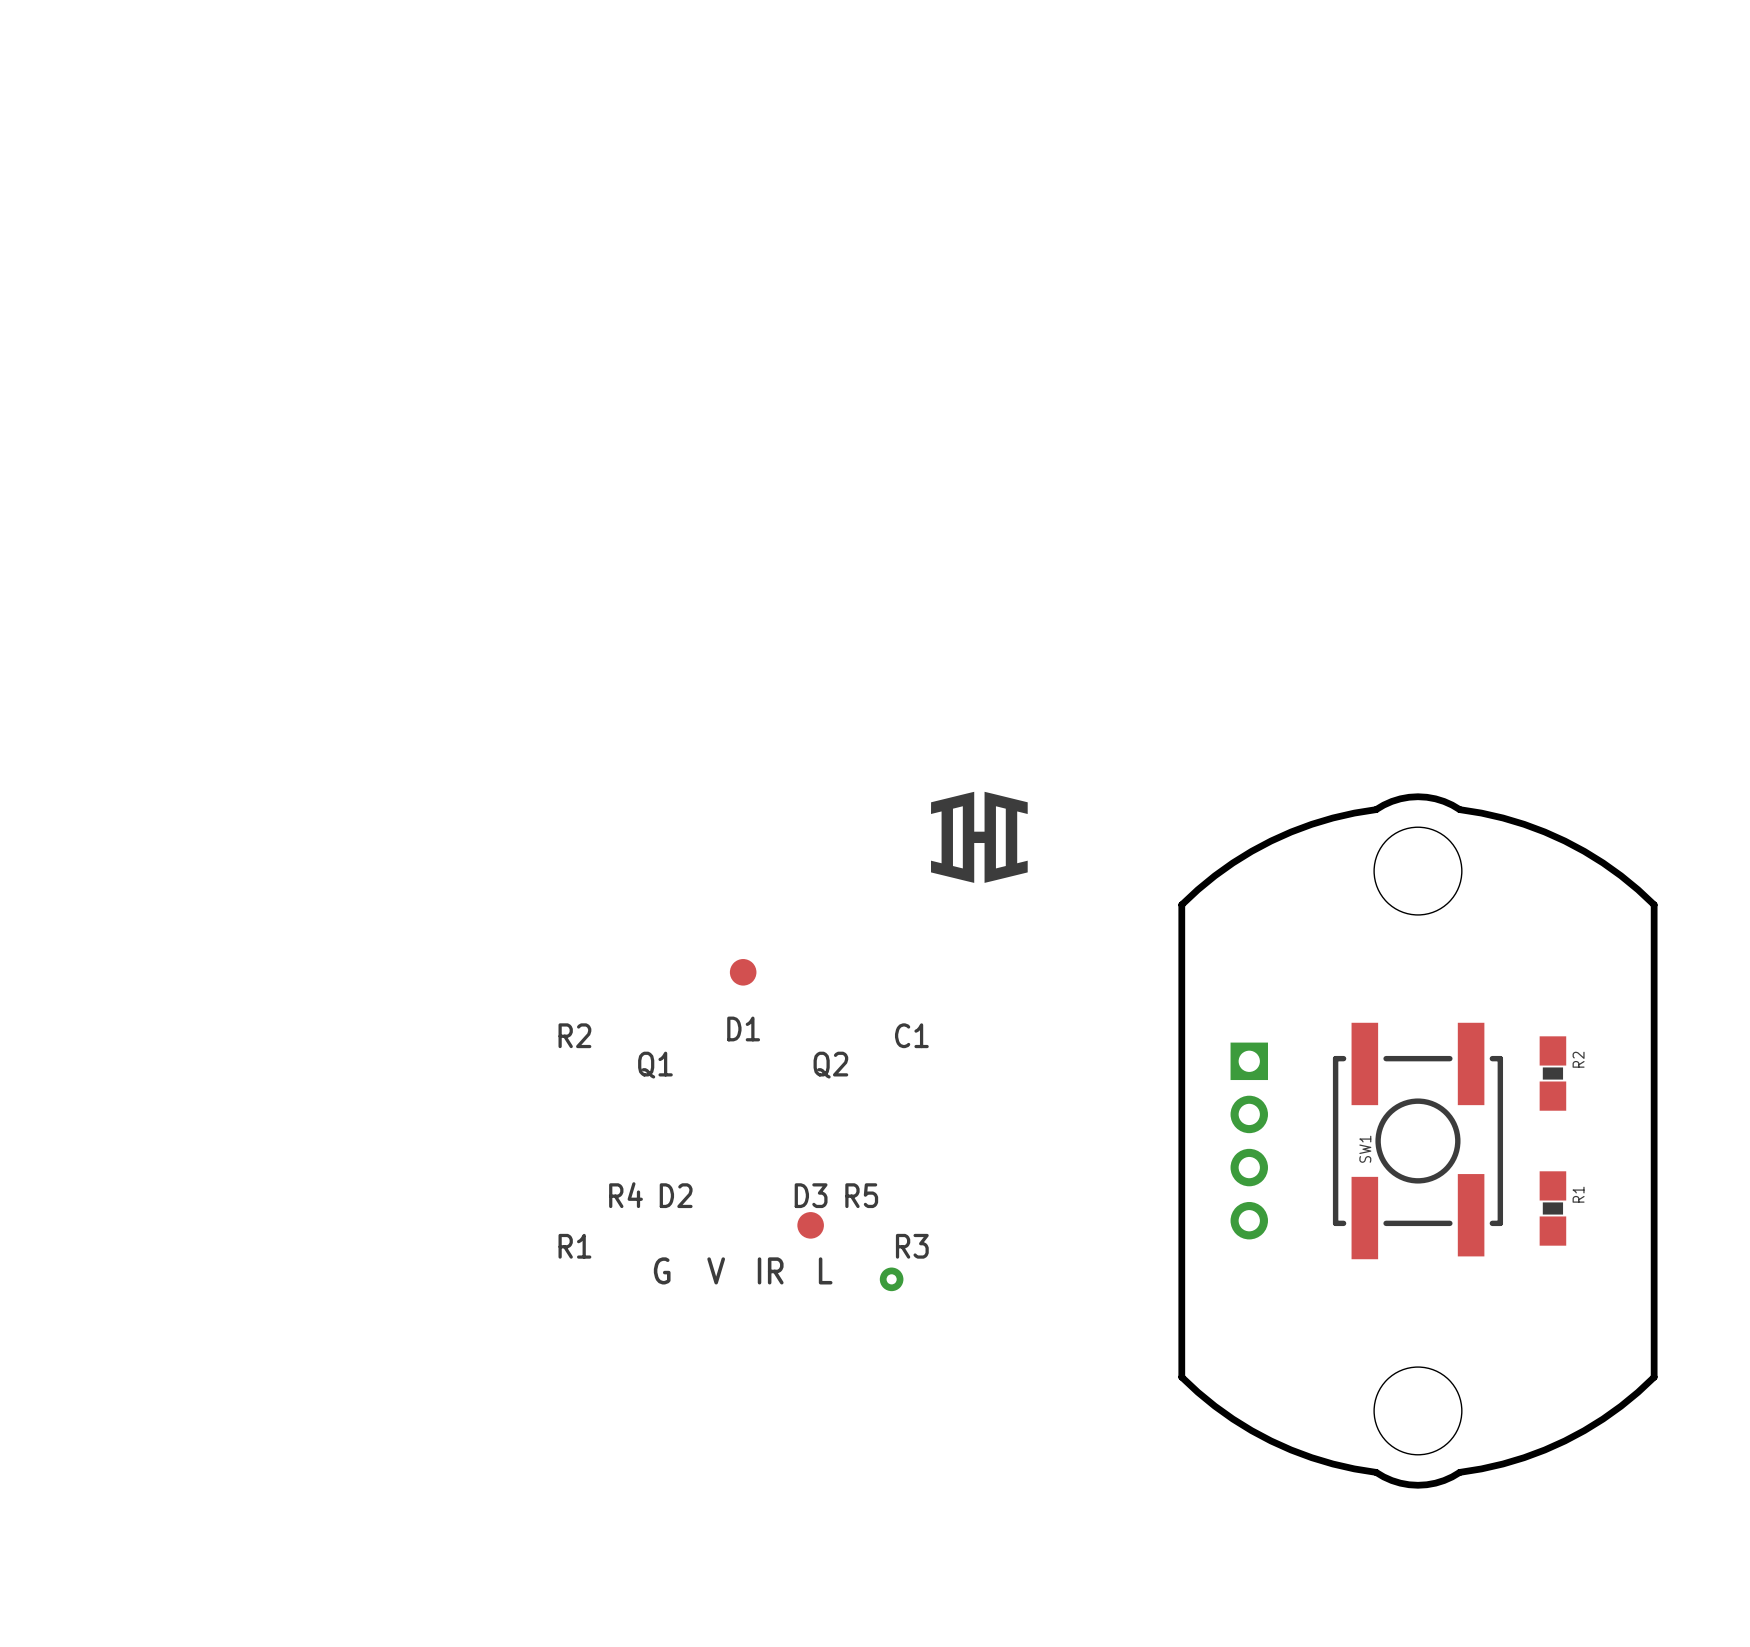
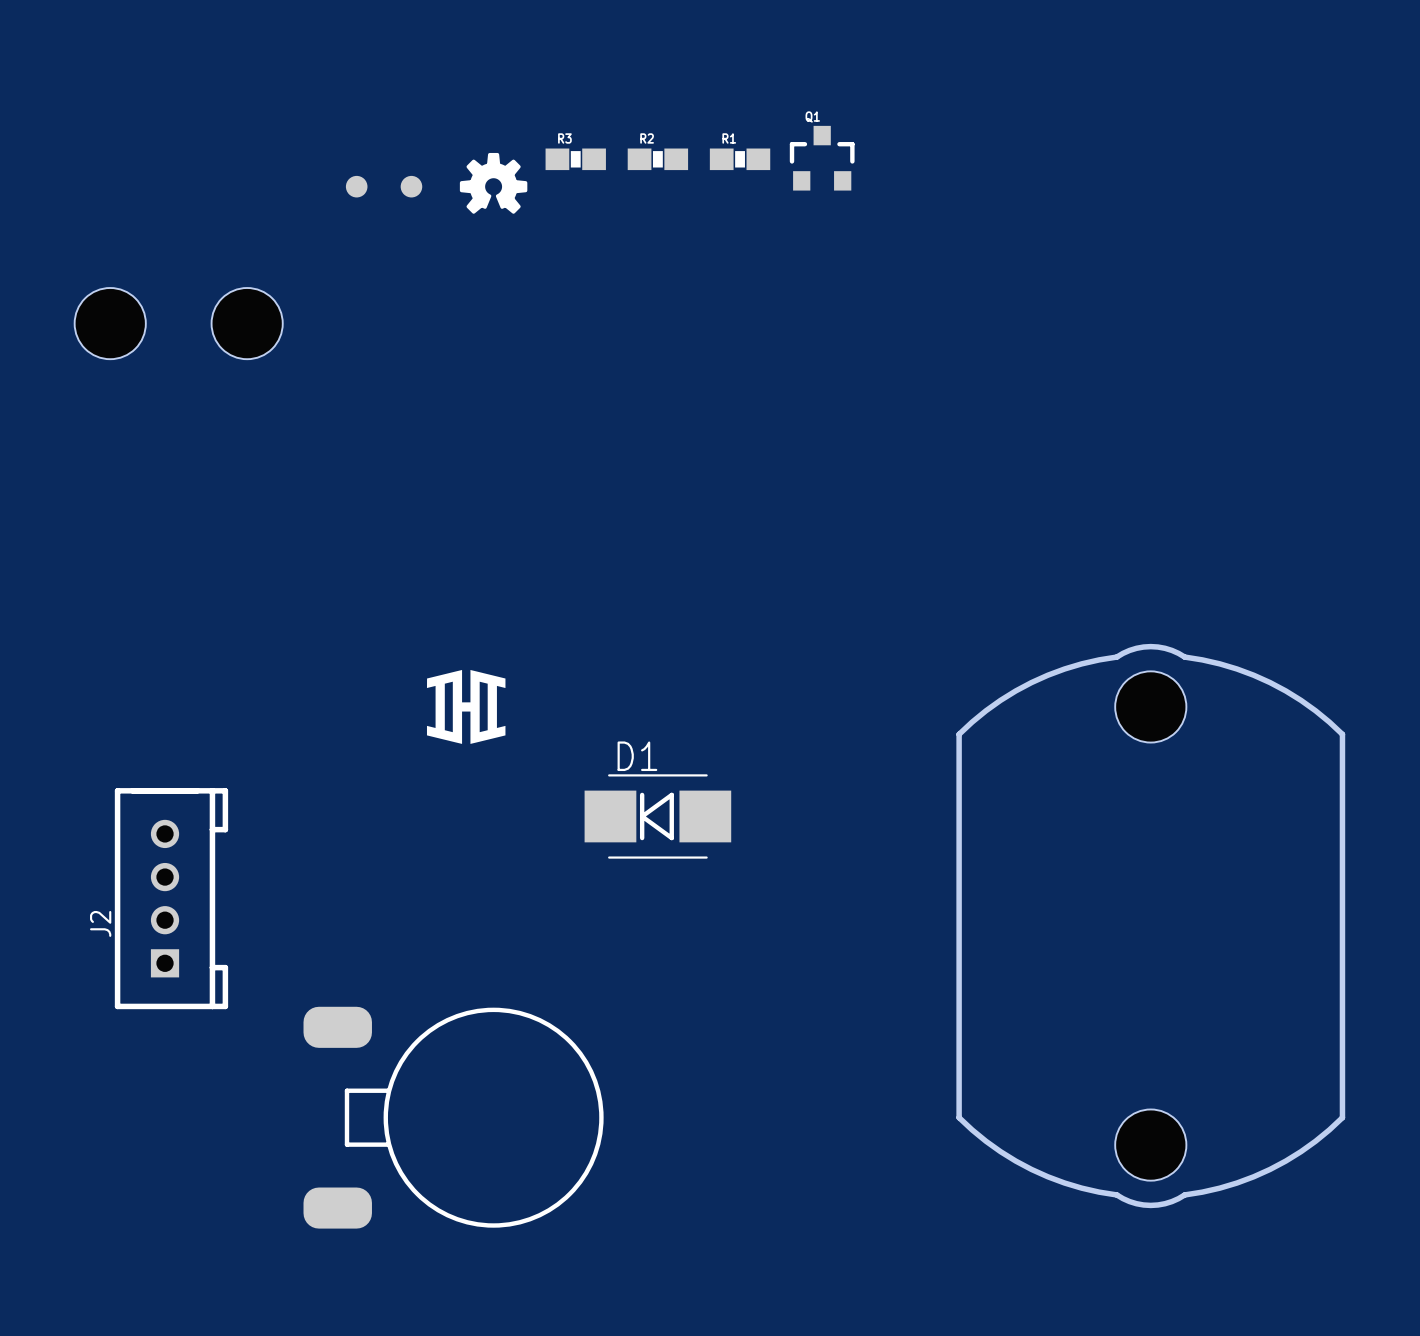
drawing: none -> [459, 152, 528, 214]
Q1: none -> (822, 158)
R3: none -> (575, 159)
part: none -> (356, 186)
part: none -> (411, 186)
part: none -> (110, 323)
part: none -> (247, 323)
drawing position: (979, 837) -> (466, 706)
part: (743, 972) -> none
D1: none -> (657, 816)
text: D1 (743, 1028) -> none
text: R2 (574, 1035) -> none
text: C1 (911, 1035) -> none
text: Q1 (655, 1065) -> none
text: Q2 (830, 1065) -> none
R2 rotation: 0° (1552, 1073) -> 90° clockwise (657, 159)
R2 position: (1552, 1073) -> (657, 159)
J2: none -> (171, 898)
part: (1249, 1141) -> none
SW1: (1417, 1141) -> none
text: R4 (626, 1195) -> none
text: D2 (676, 1195) -> none
text: D3 (811, 1195) -> none
text: R5 (861, 1195) -> none
R1 rotation: 0° (1552, 1208) -> 90° clockwise (740, 159)
R1 position: (1552, 1208) -> (740, 159)
part: (810, 1225) -> none
text: R1 (574, 1246) -> none
text: R3 (912, 1246) -> none
text: G (662, 1270) -> none
text: V (716, 1270) -> none
text: IR (770, 1270) -> none
text: L (825, 1270) -> none
via: (891, 1279) -> none
part: none -> (453, 1117)

